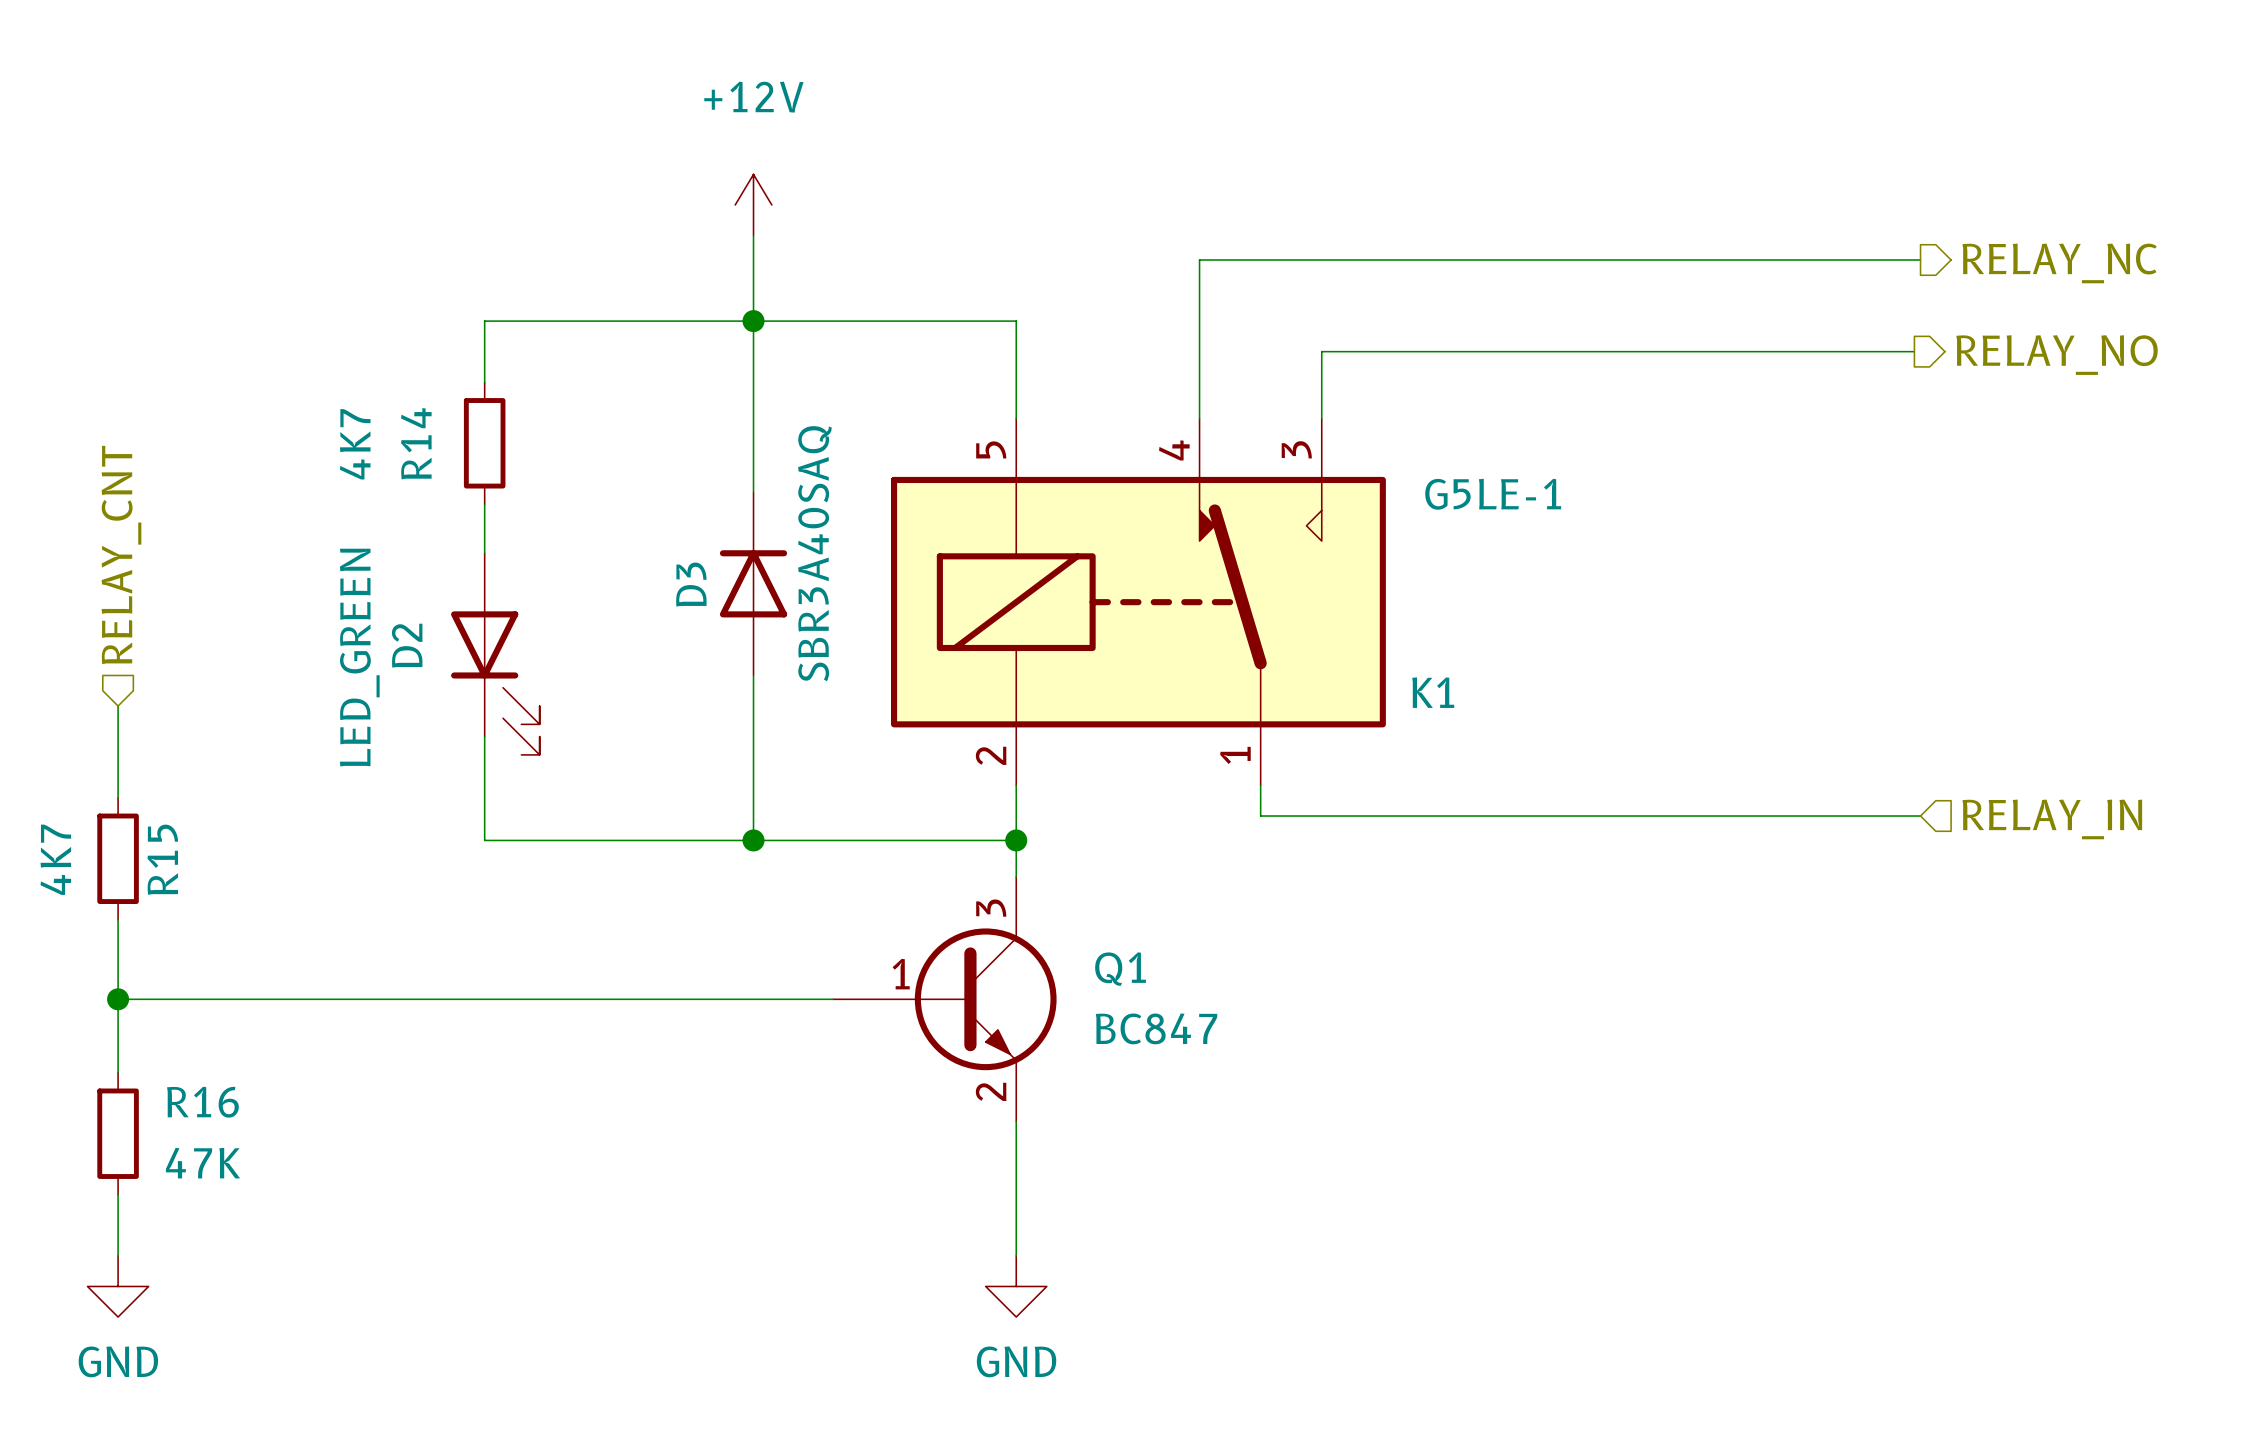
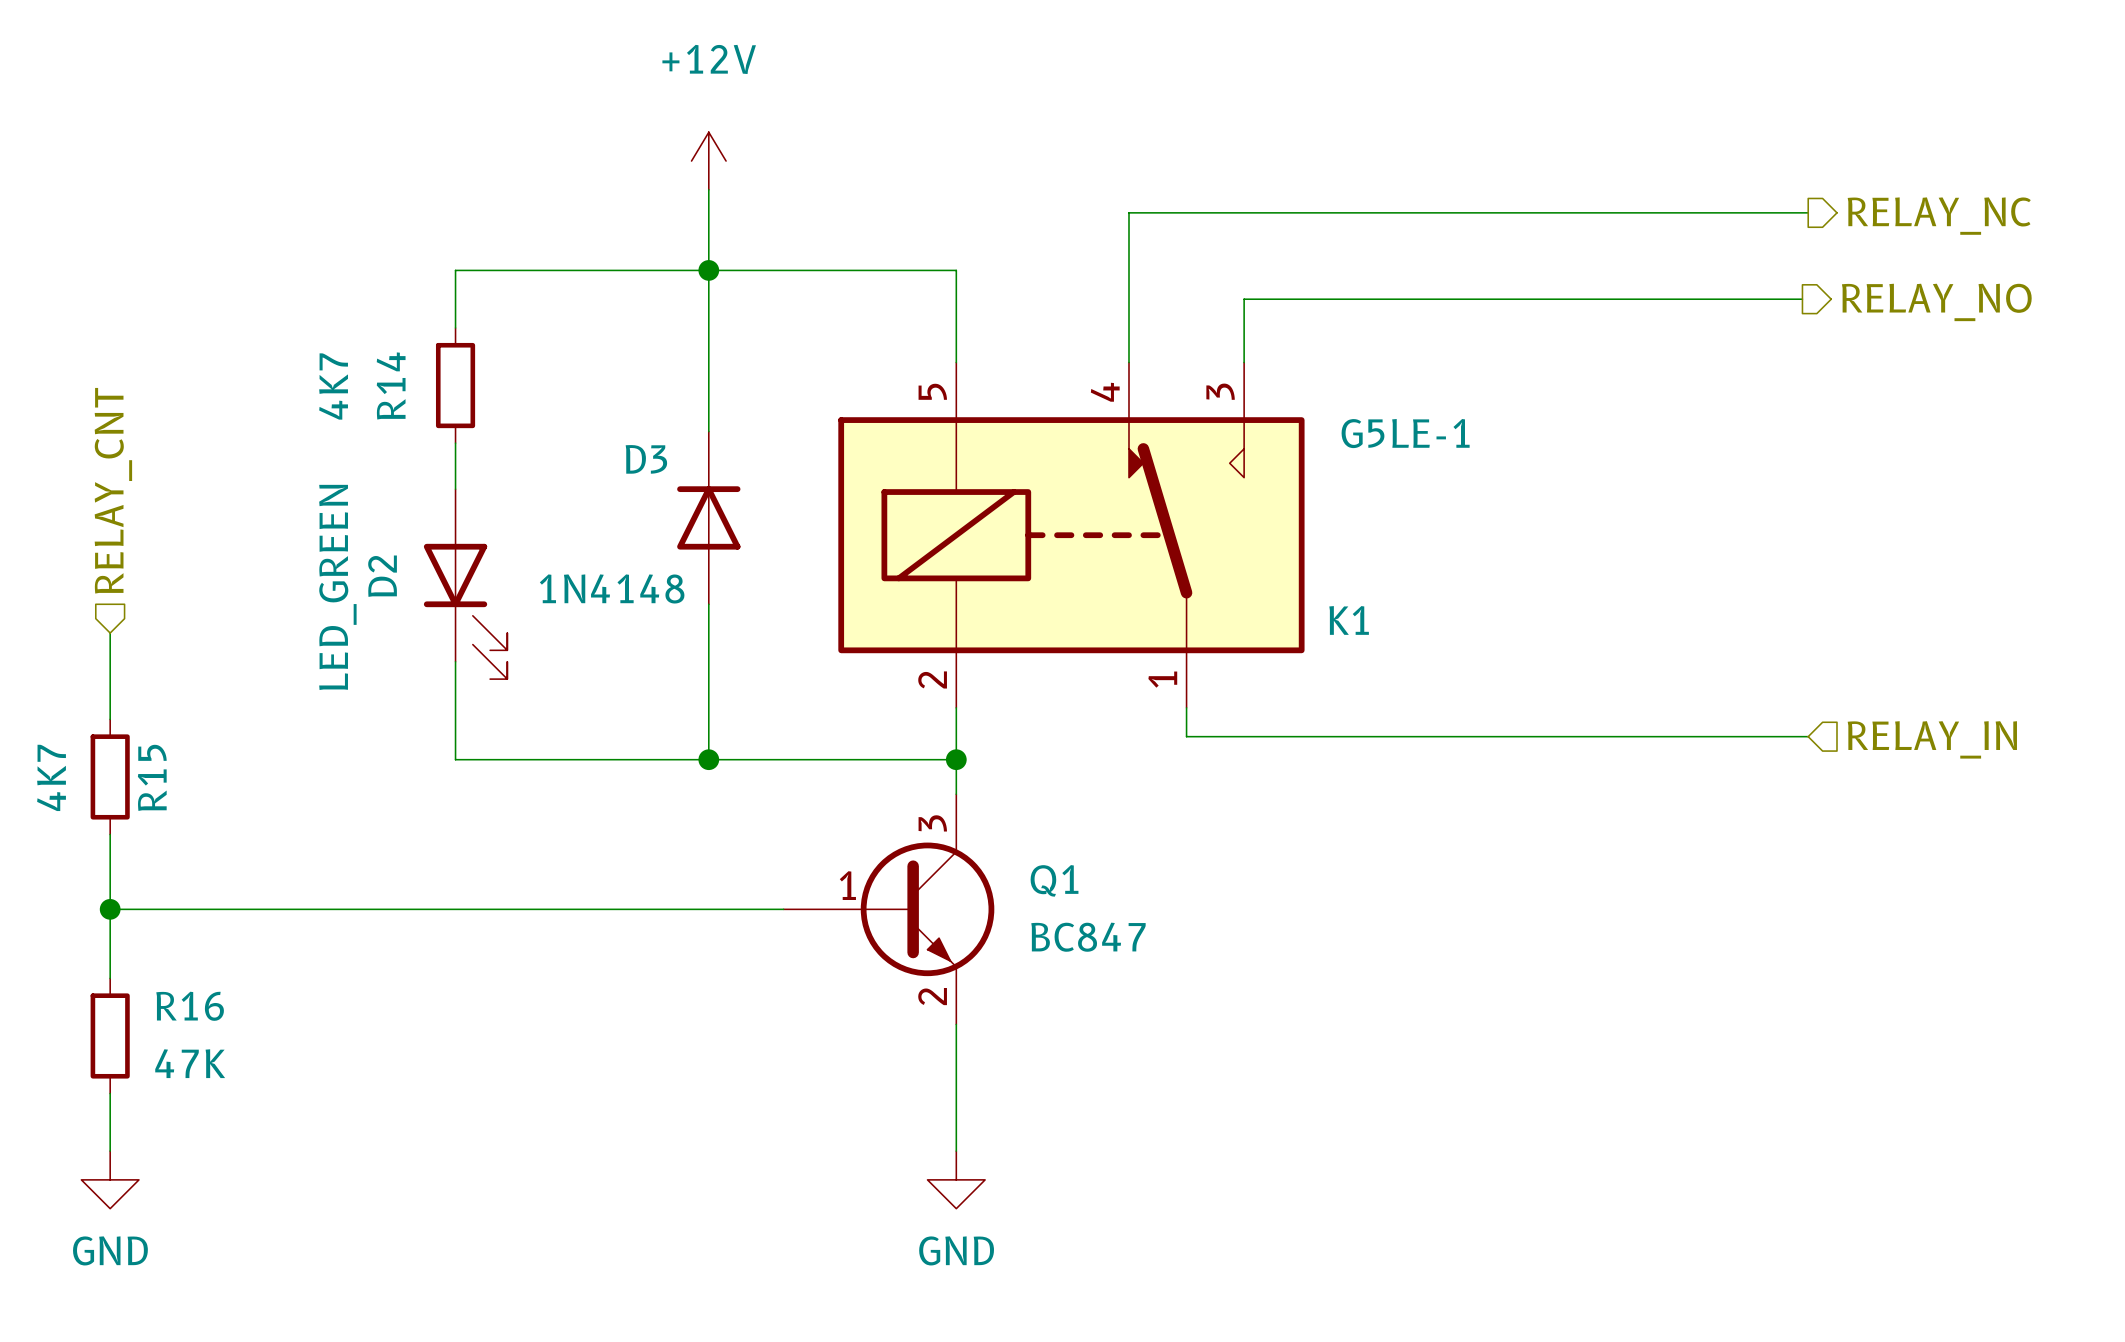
D3 value: SBR3A40SAQ (814, 553) -> 1N4148 (612, 588)
D3 name rotation: 0° (691, 584) -> 90° clockwise (646, 459)

